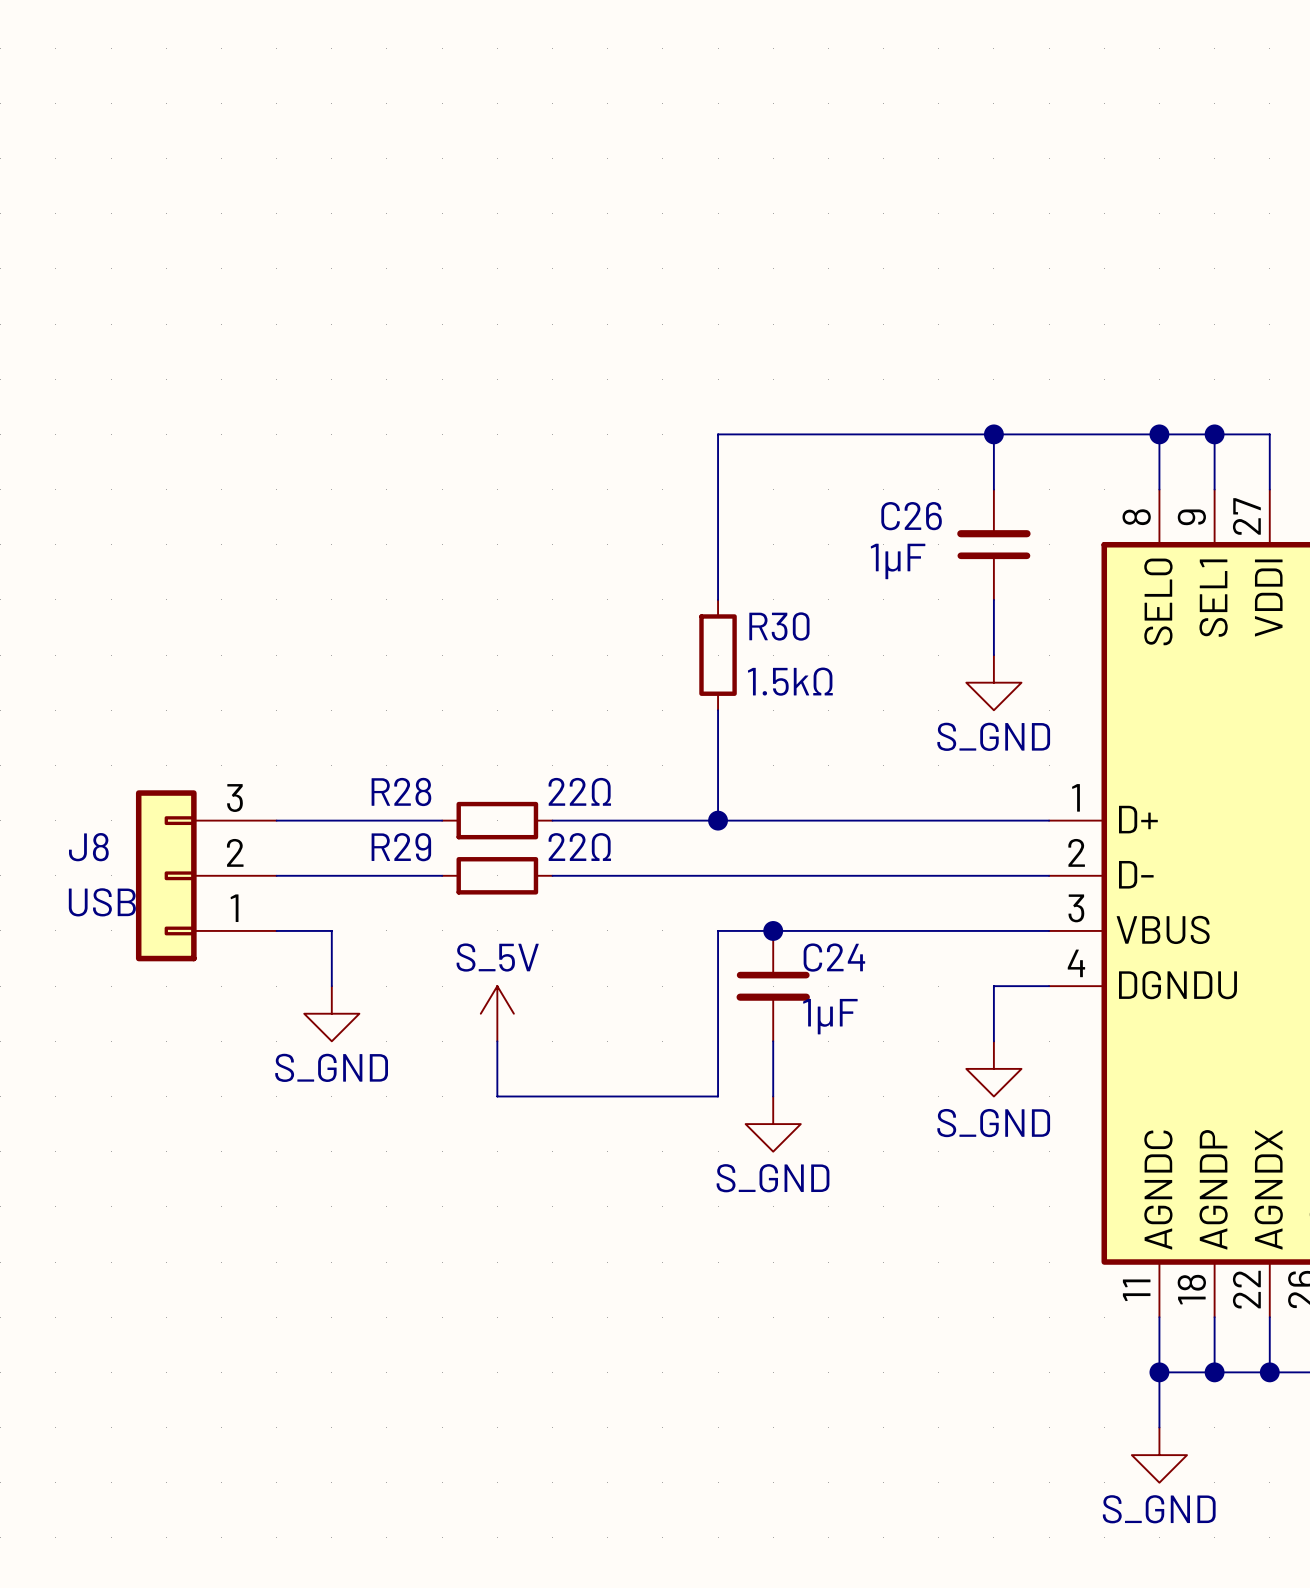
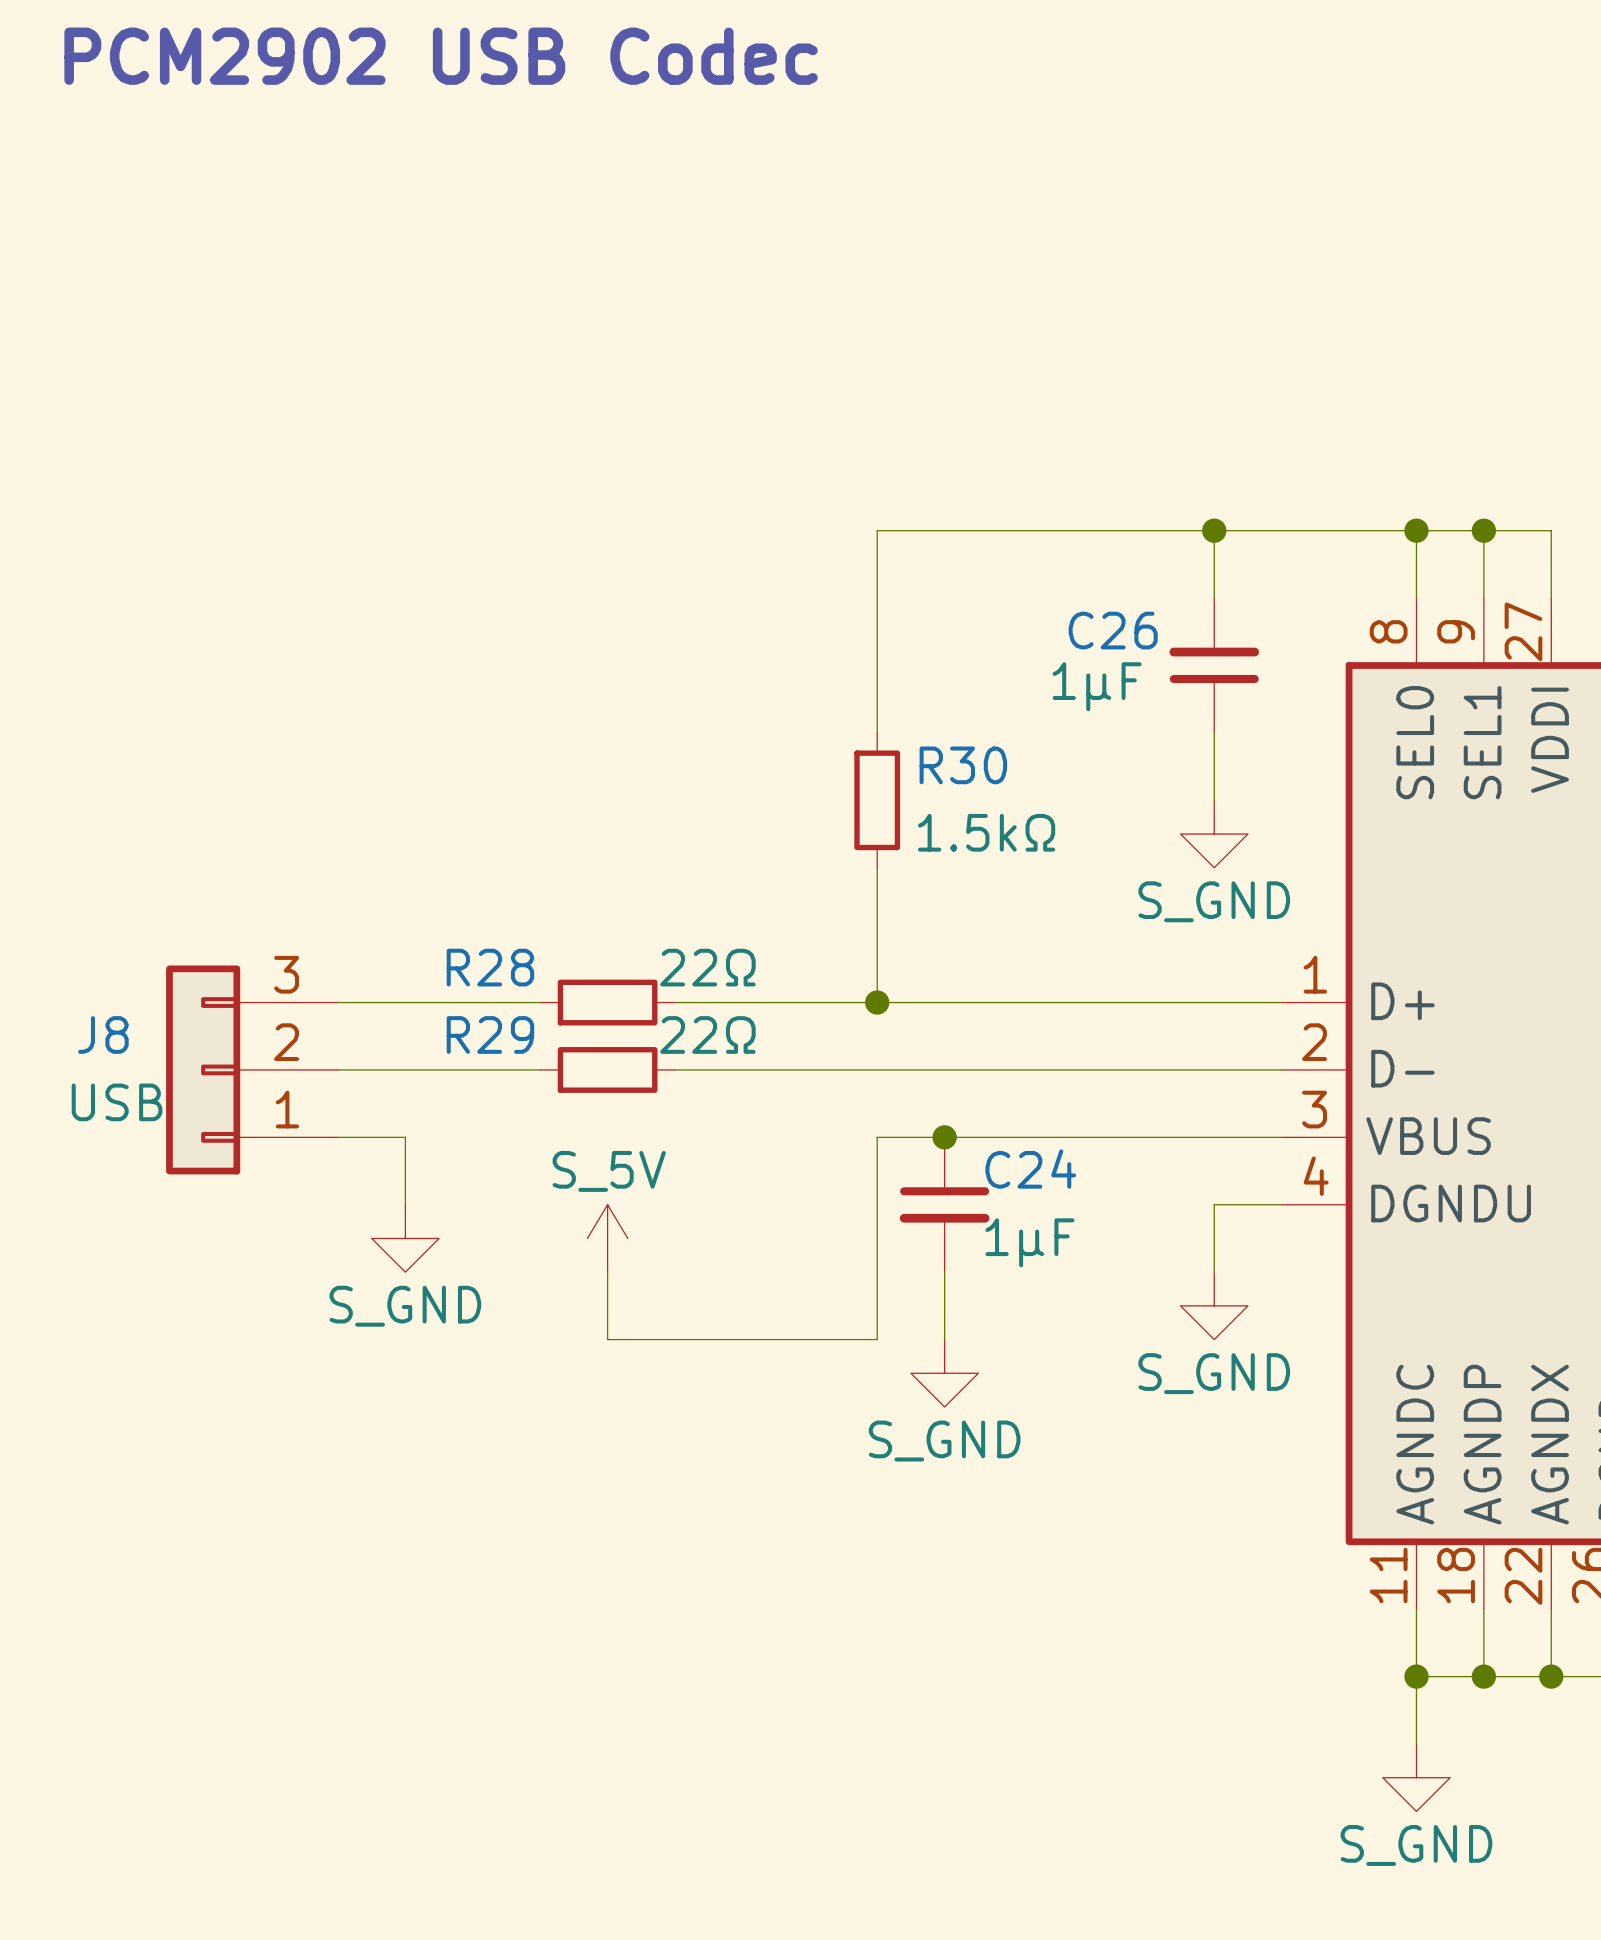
text: none -> PCM2902 USB Codec (441, 56)

